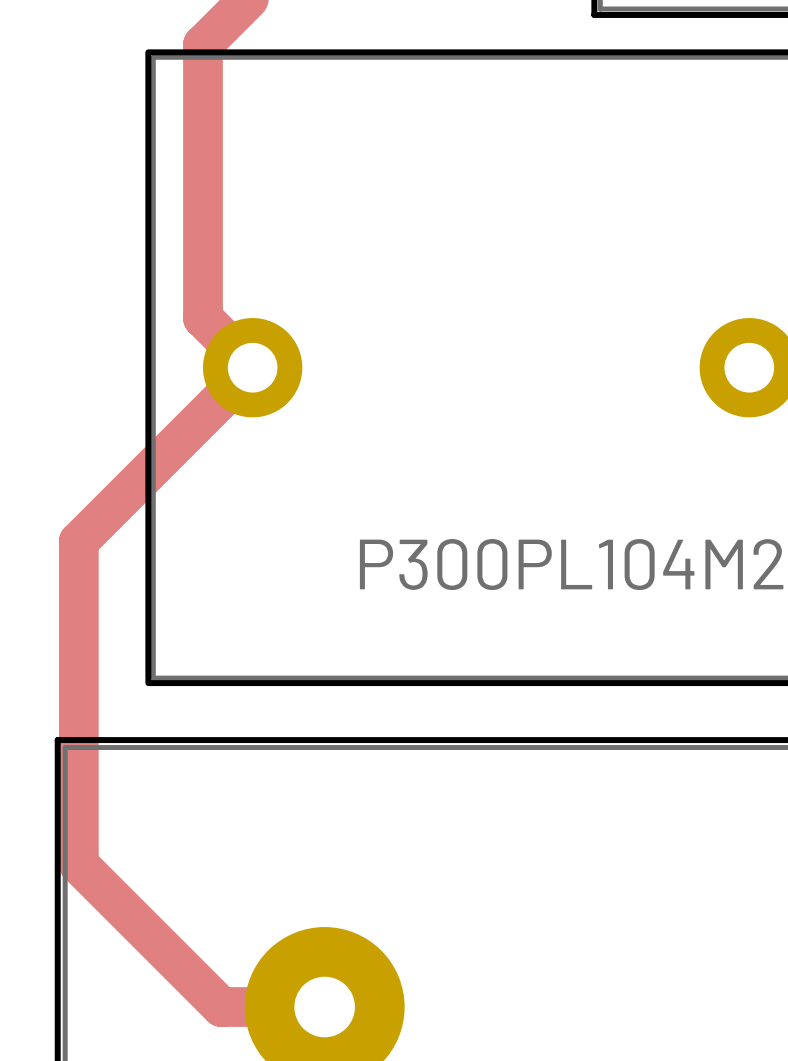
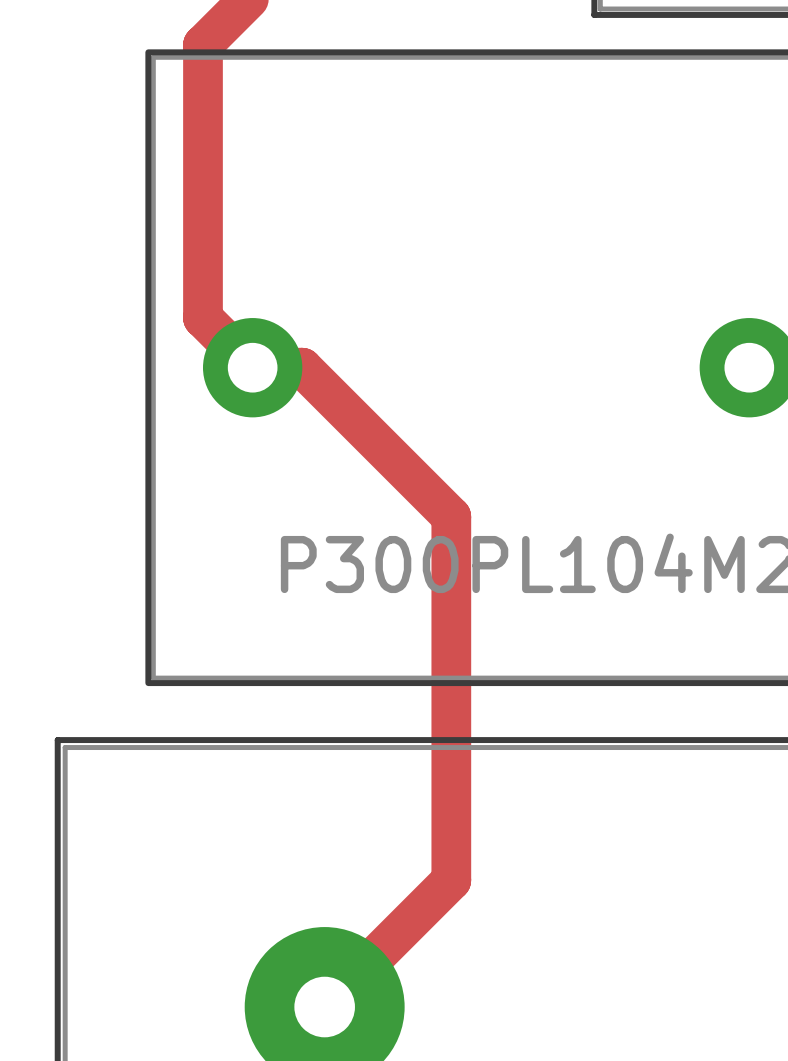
top track: (252, 367) (78, 541) (78, 864) (221, 1007) (324, 1007) -> (252, 367) (302, 367) (451, 516) (451, 880) (324, 1007)

